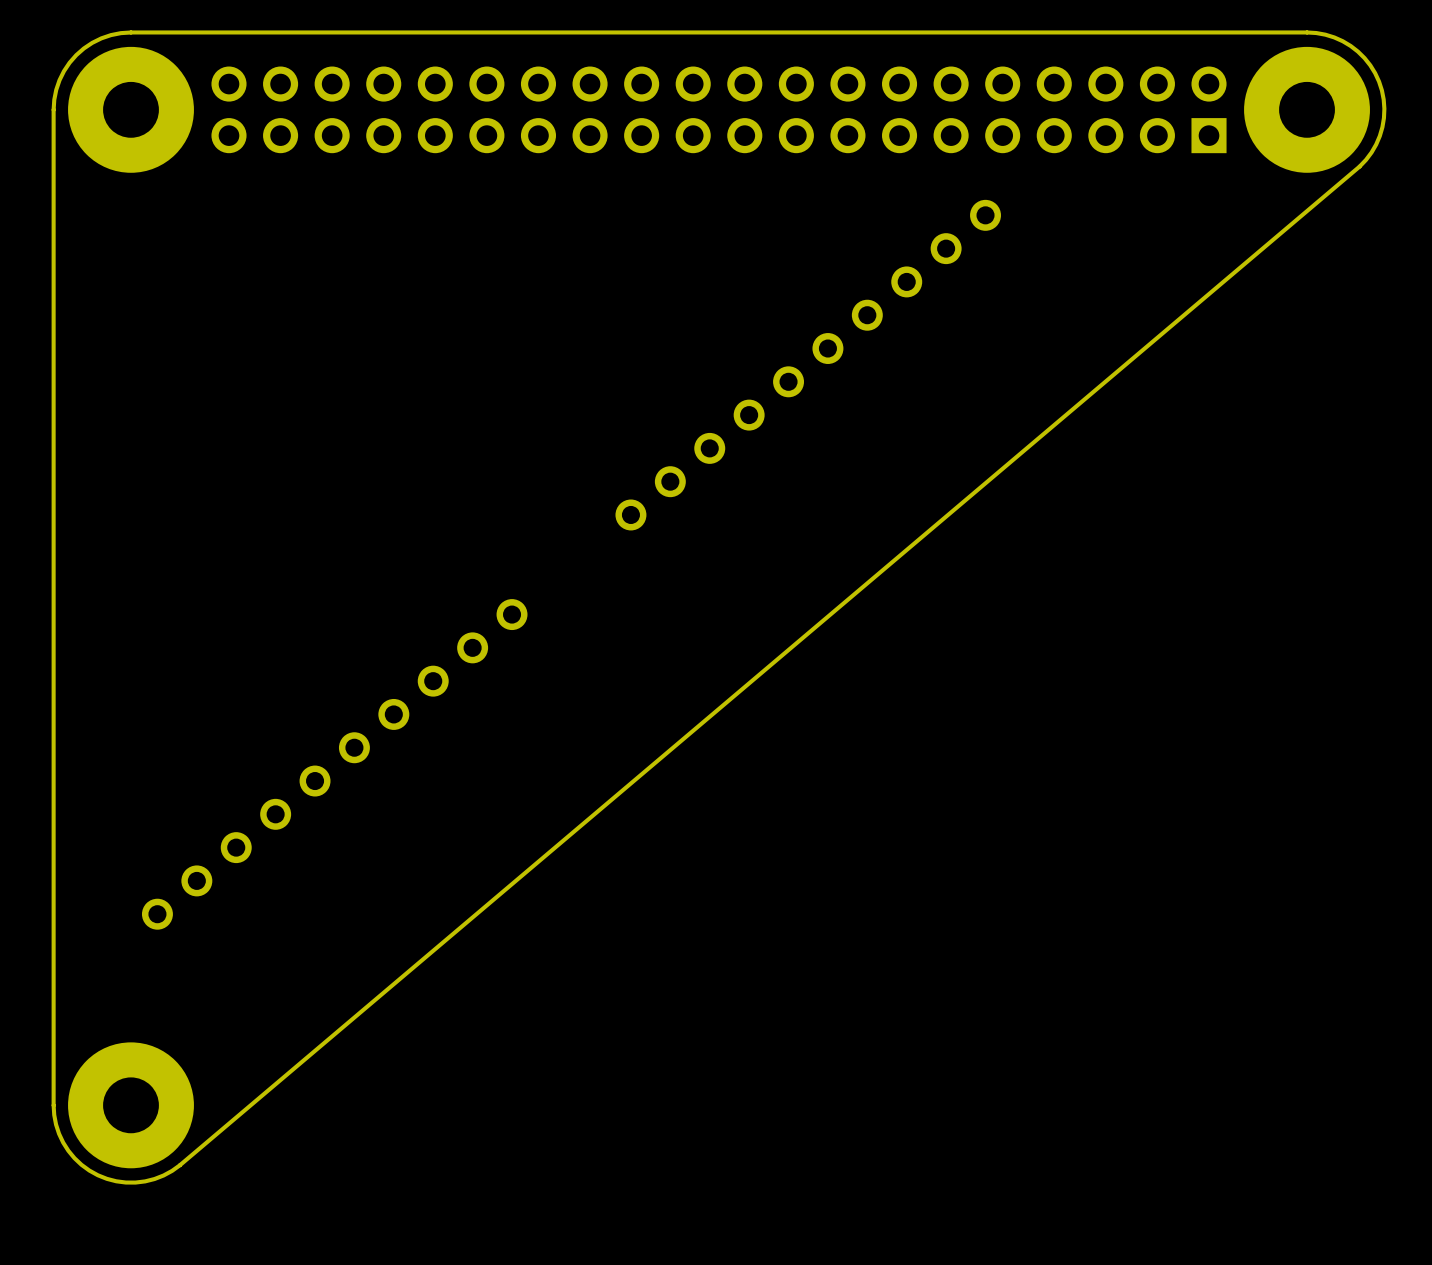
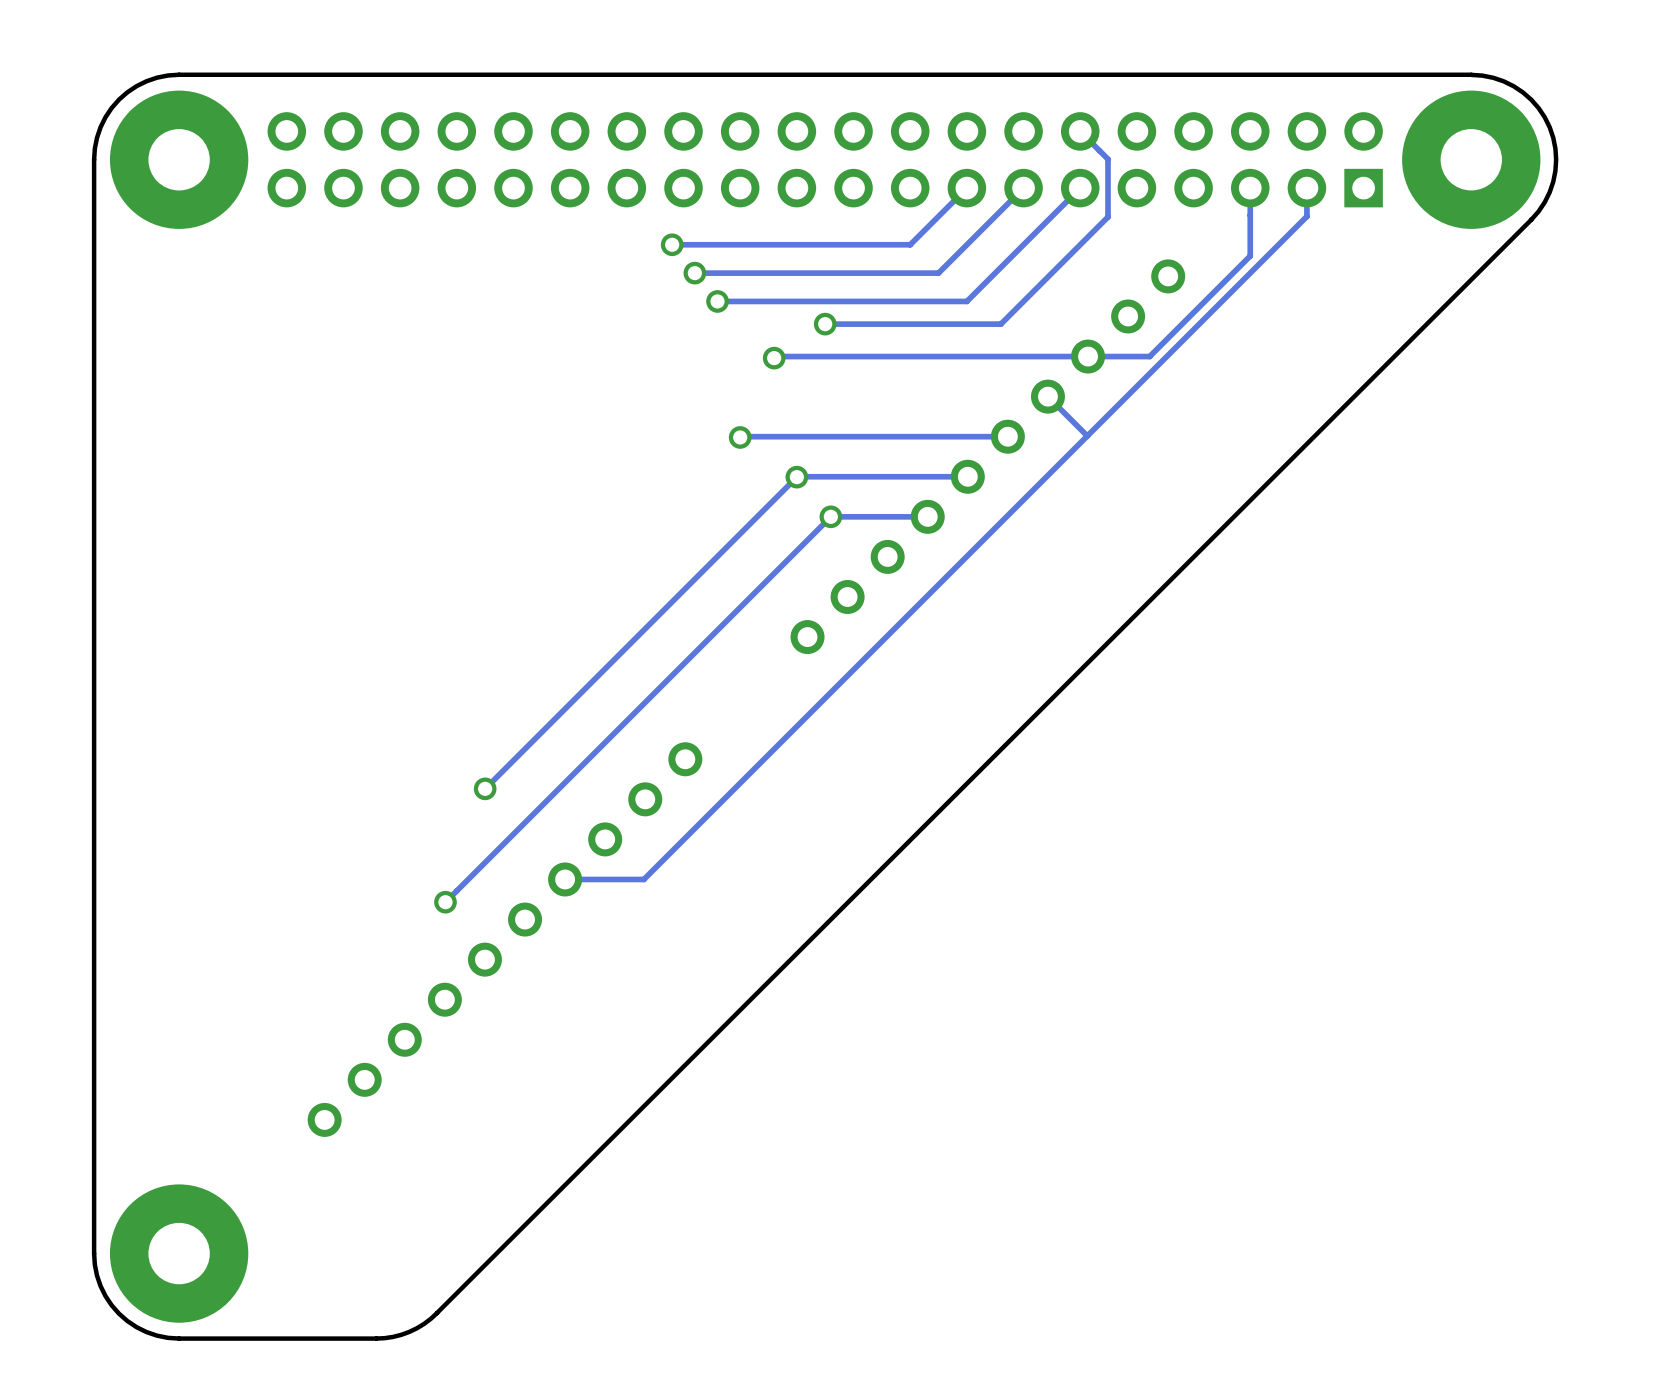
board edge: (1307, 32) (1334, 37) (1350, 45) (1370, 65) (1379, 81) (1384, 108) (1382, 127) (1376, 144) (1359, 166) (172, 1170) (154, 1179) (135, 1182) (116, 1181) (97, 1175) (74, 1158) (63, 1142) (56, 1124) (53, 1105) -> (1471, 74) (1503, 81) (1522, 92) (1538, 108) (1549, 127) (1555, 148) (1555, 170) (1549, 192) (1538, 211) (430, 1318) (409, 1331) (384, 1338) (168, 1337) (136, 1327) (119, 1313) (100, 1286) (94, 1253)
track: none -> (1080, 131) (1108, 159) (1108, 217) (1000, 324) (825, 324)
track: none -> (966, 188) (910, 244) (672, 244)
track: none -> (1023, 188) (938, 273) (694, 273)
track: none -> (1080, 188) (966, 301) (717, 301)
track: none -> (1250, 188) (1250, 256) (1149, 356) (775, 356) (774, 358)
track: none -> (1306, 188) (1306, 216) (643, 879) (565, 879)
via: none -> (672, 244)
via: none -> (694, 273)
via: none -> (717, 301)
via: none -> (825, 324)
via: none -> (774, 358)
track: none -> (1047, 396) (1087, 435)
track: none -> (1007, 436) (740, 436)
via: none -> (740, 437)
part: (808, 365) -> none
part: none -> (987, 456)
via: none -> (796, 477)
track: none -> (967, 476) (797, 476) (485, 788)
via: none -> (830, 516)
track: none -> (927, 516) (830, 516) (445, 902)
via: none -> (485, 788)
part: (334, 764) -> none
via: none -> (445, 902)
part: none -> (504, 939)

